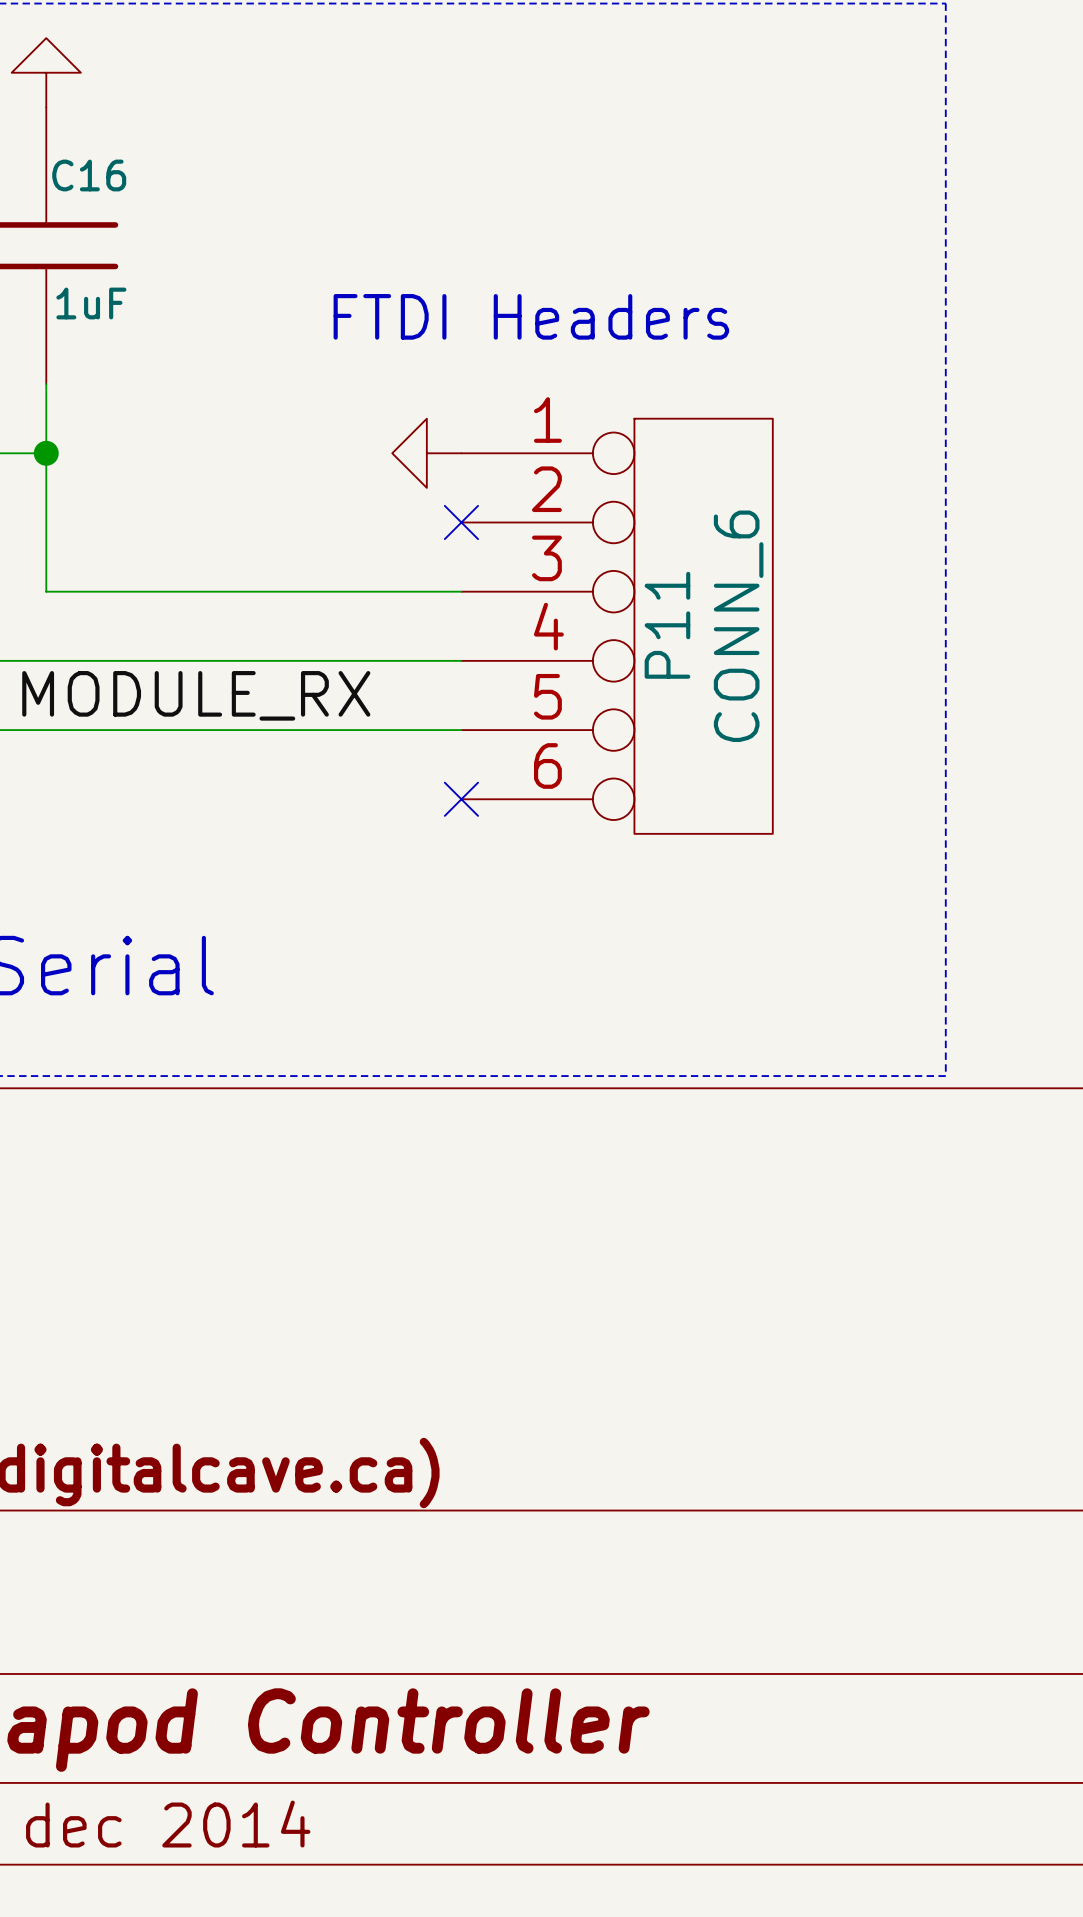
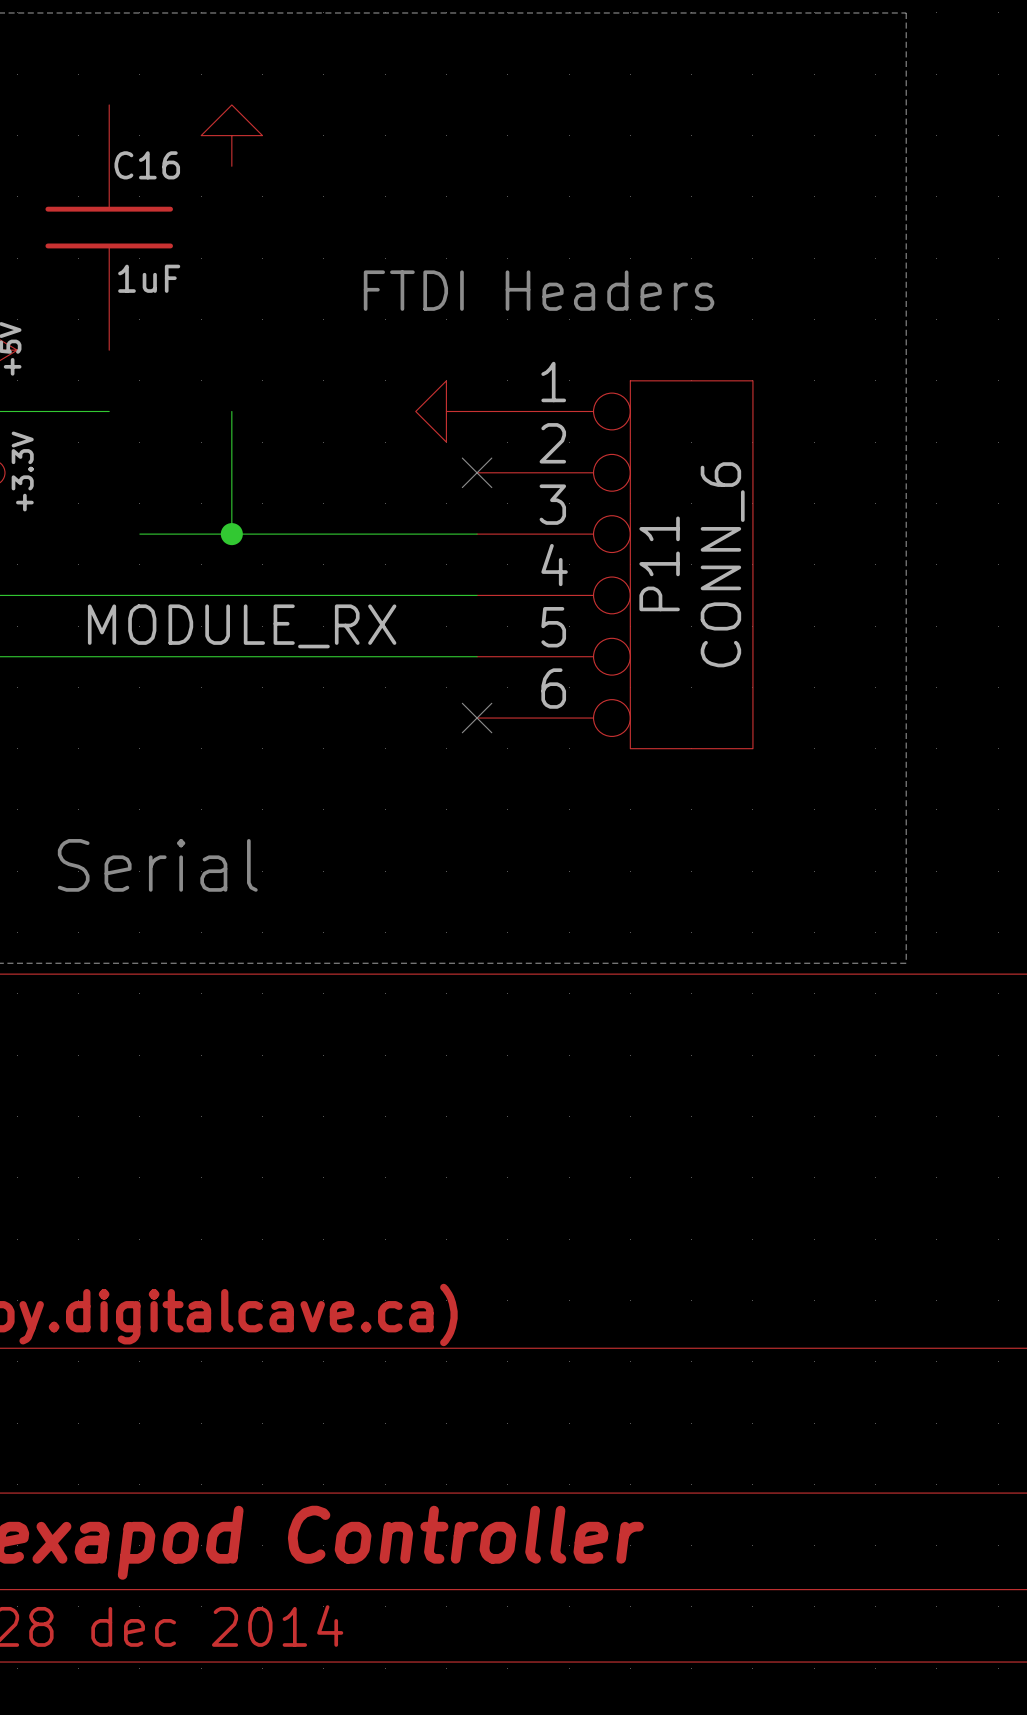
power symbol position: (46, 72) -> (231, 135)
wire: (46, 384) (46, 591) (80, 591) -> none
junction: (46, 453) -> none
wire: none -> (231, 411) (231, 534)
junction: none -> (231, 534)

